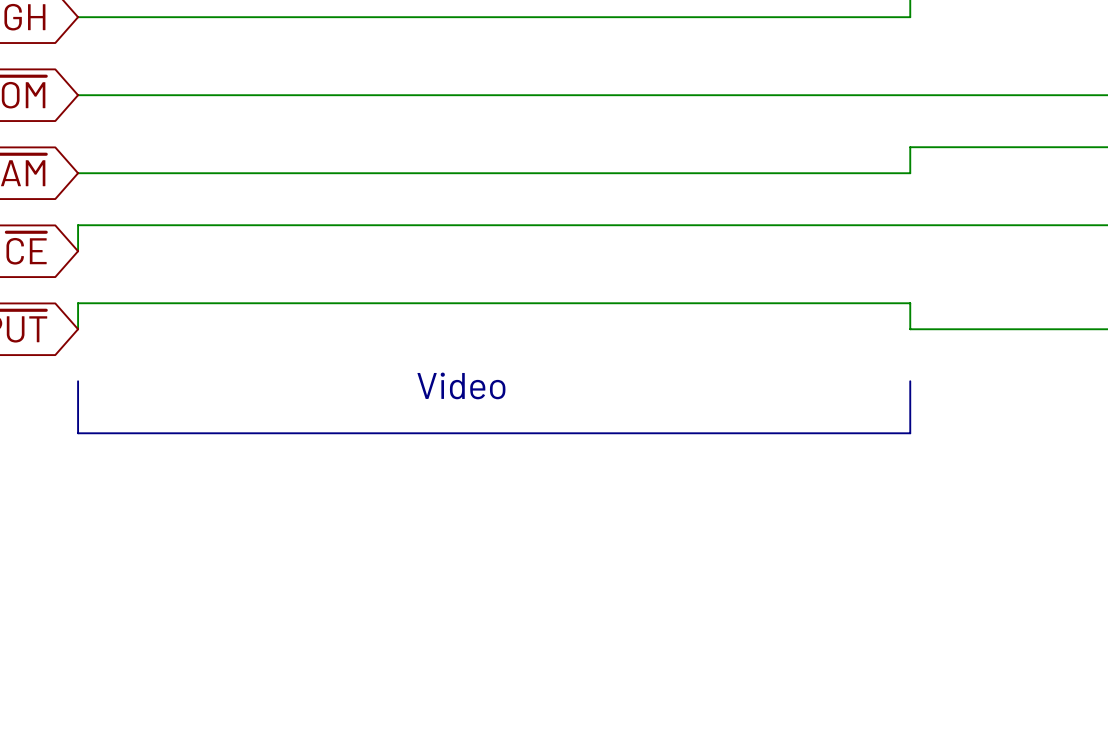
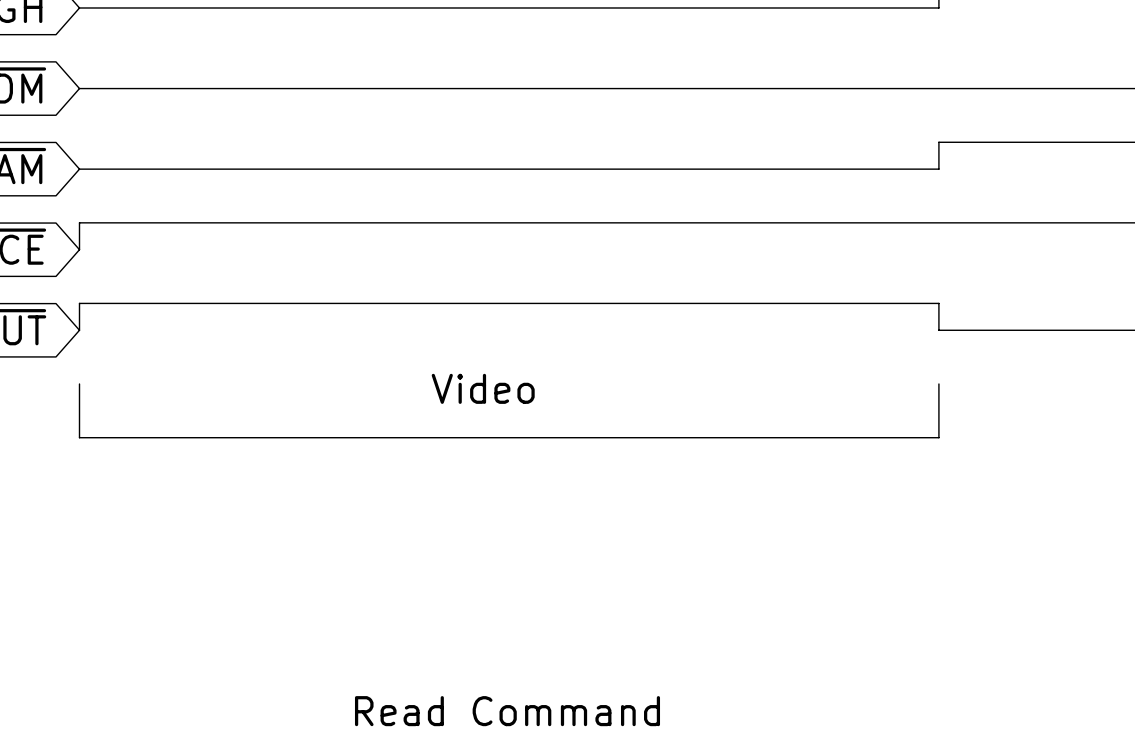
text: none -> Read Command (507, 711)

